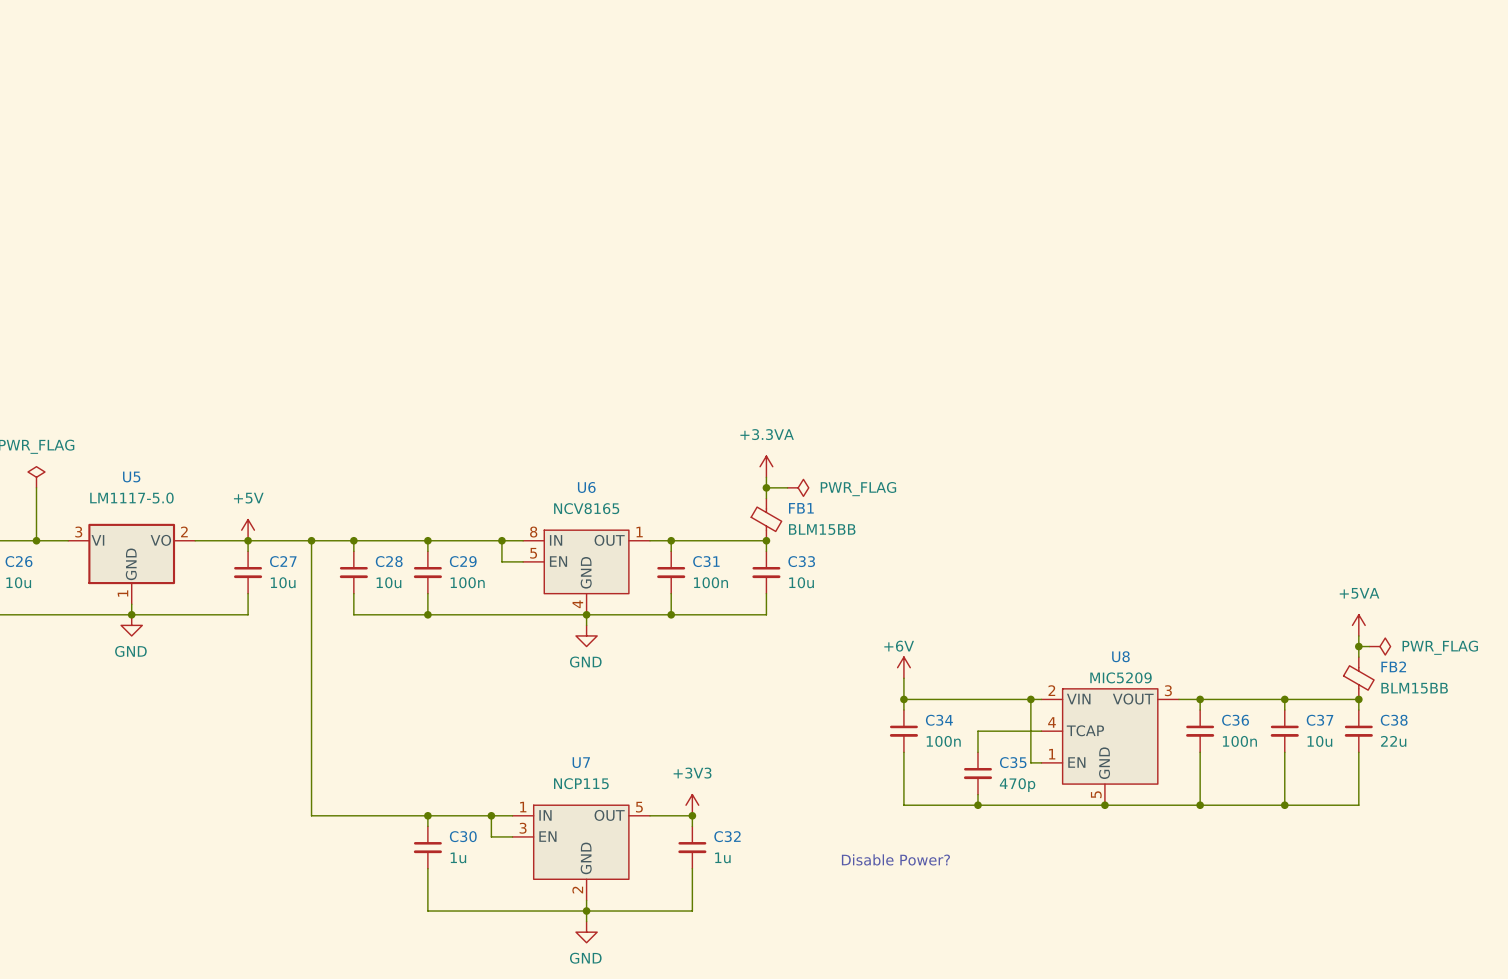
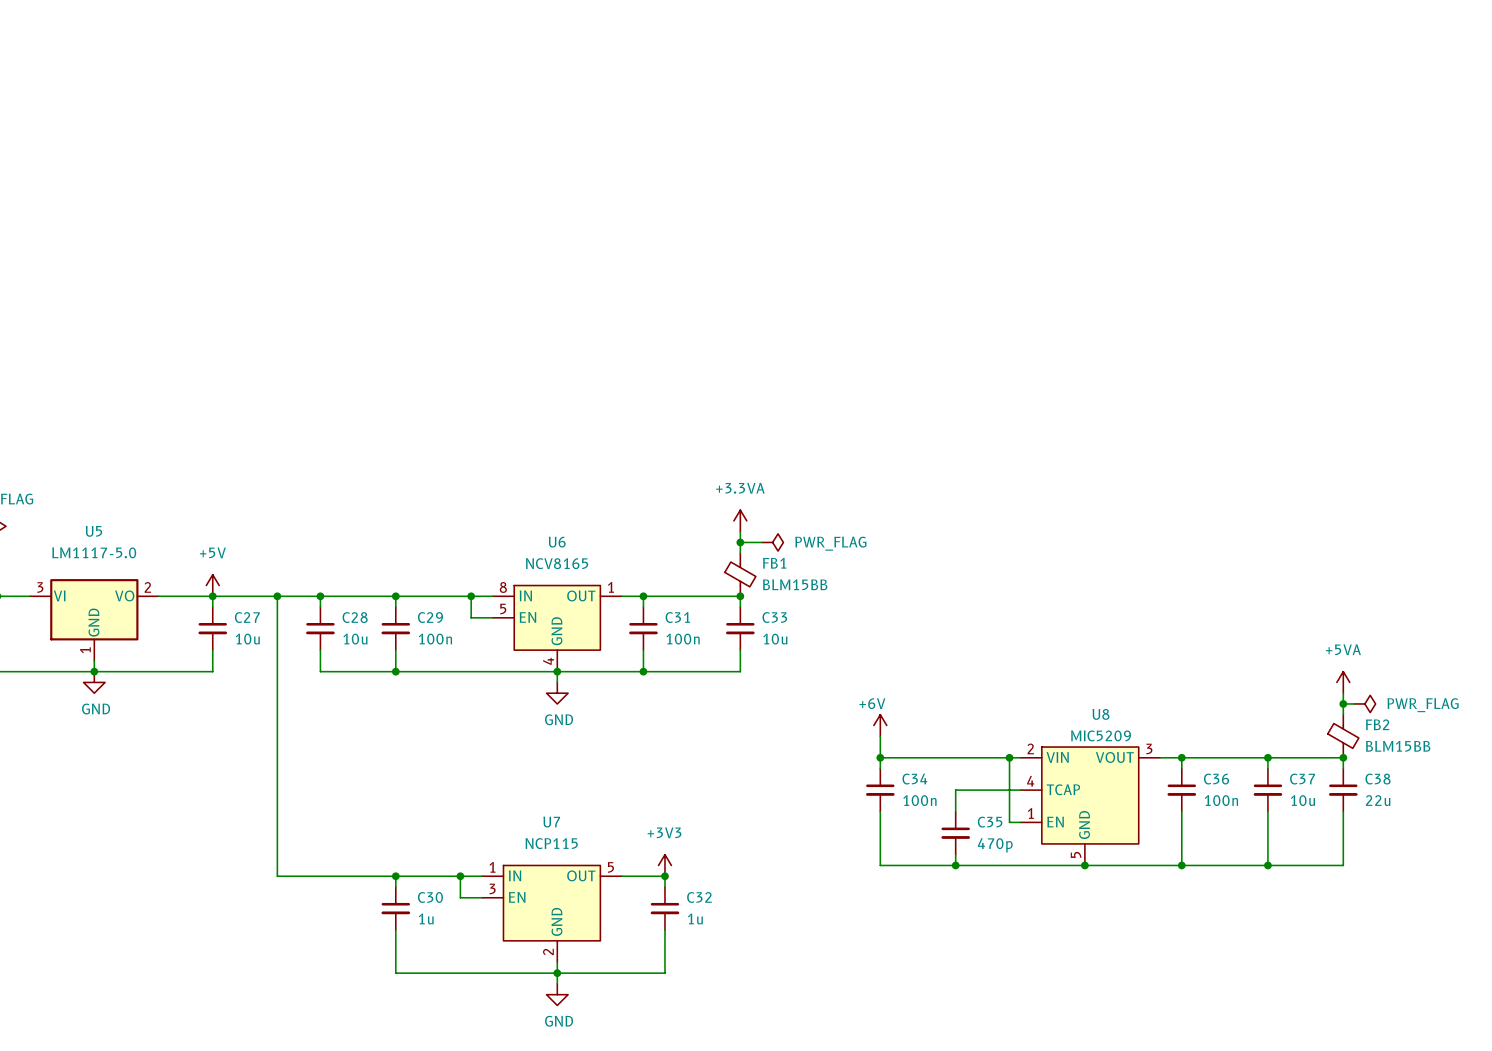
text: Disable Power? (895, 859) -> none

